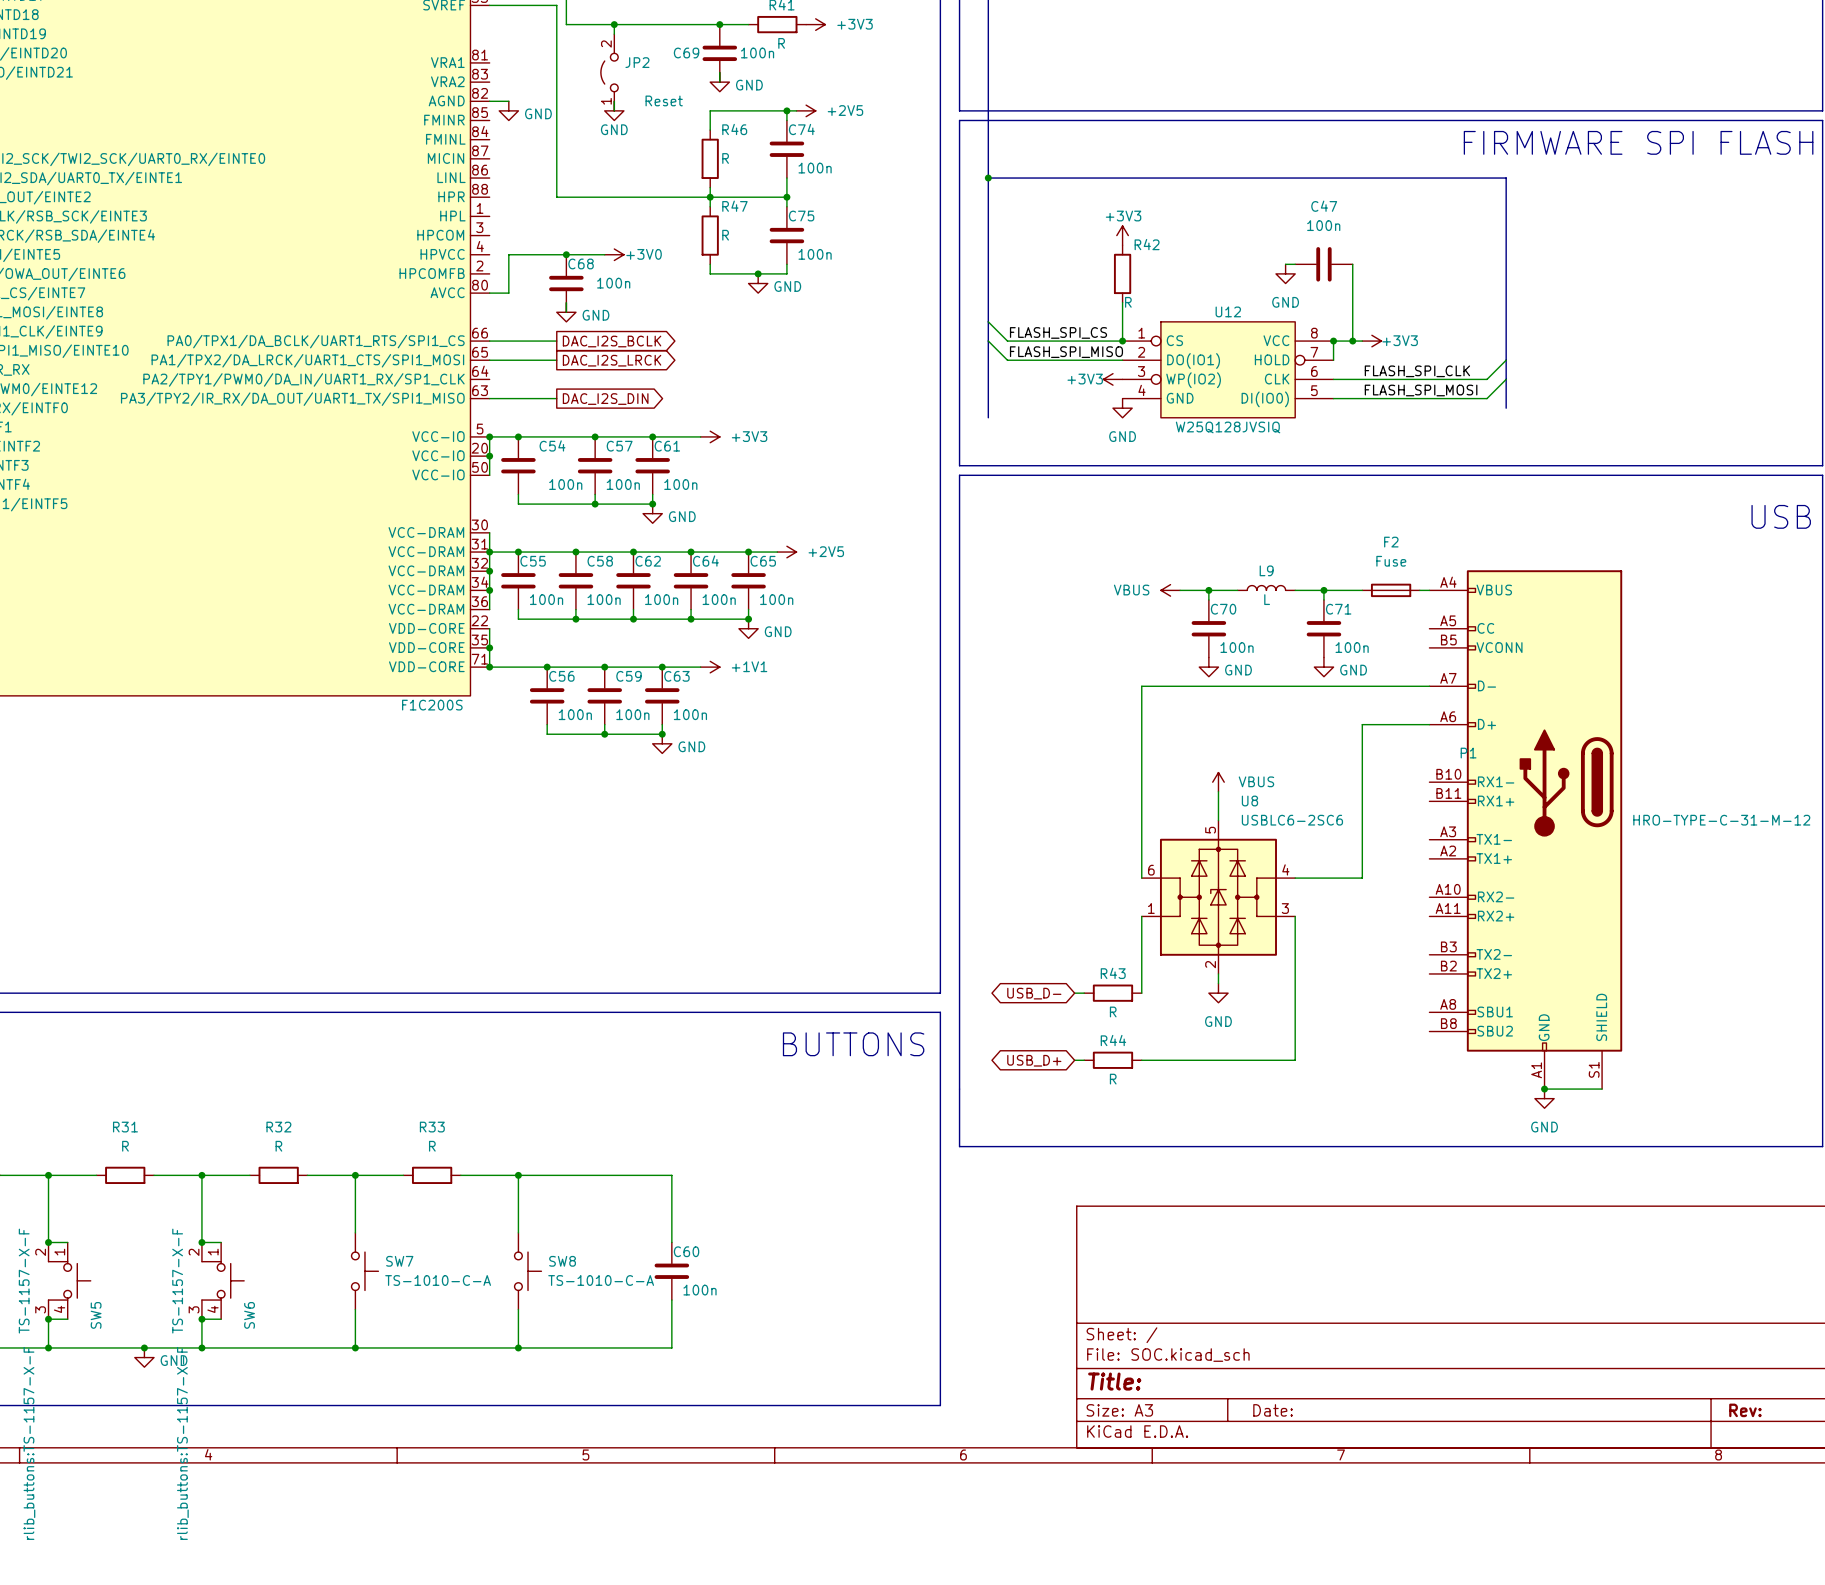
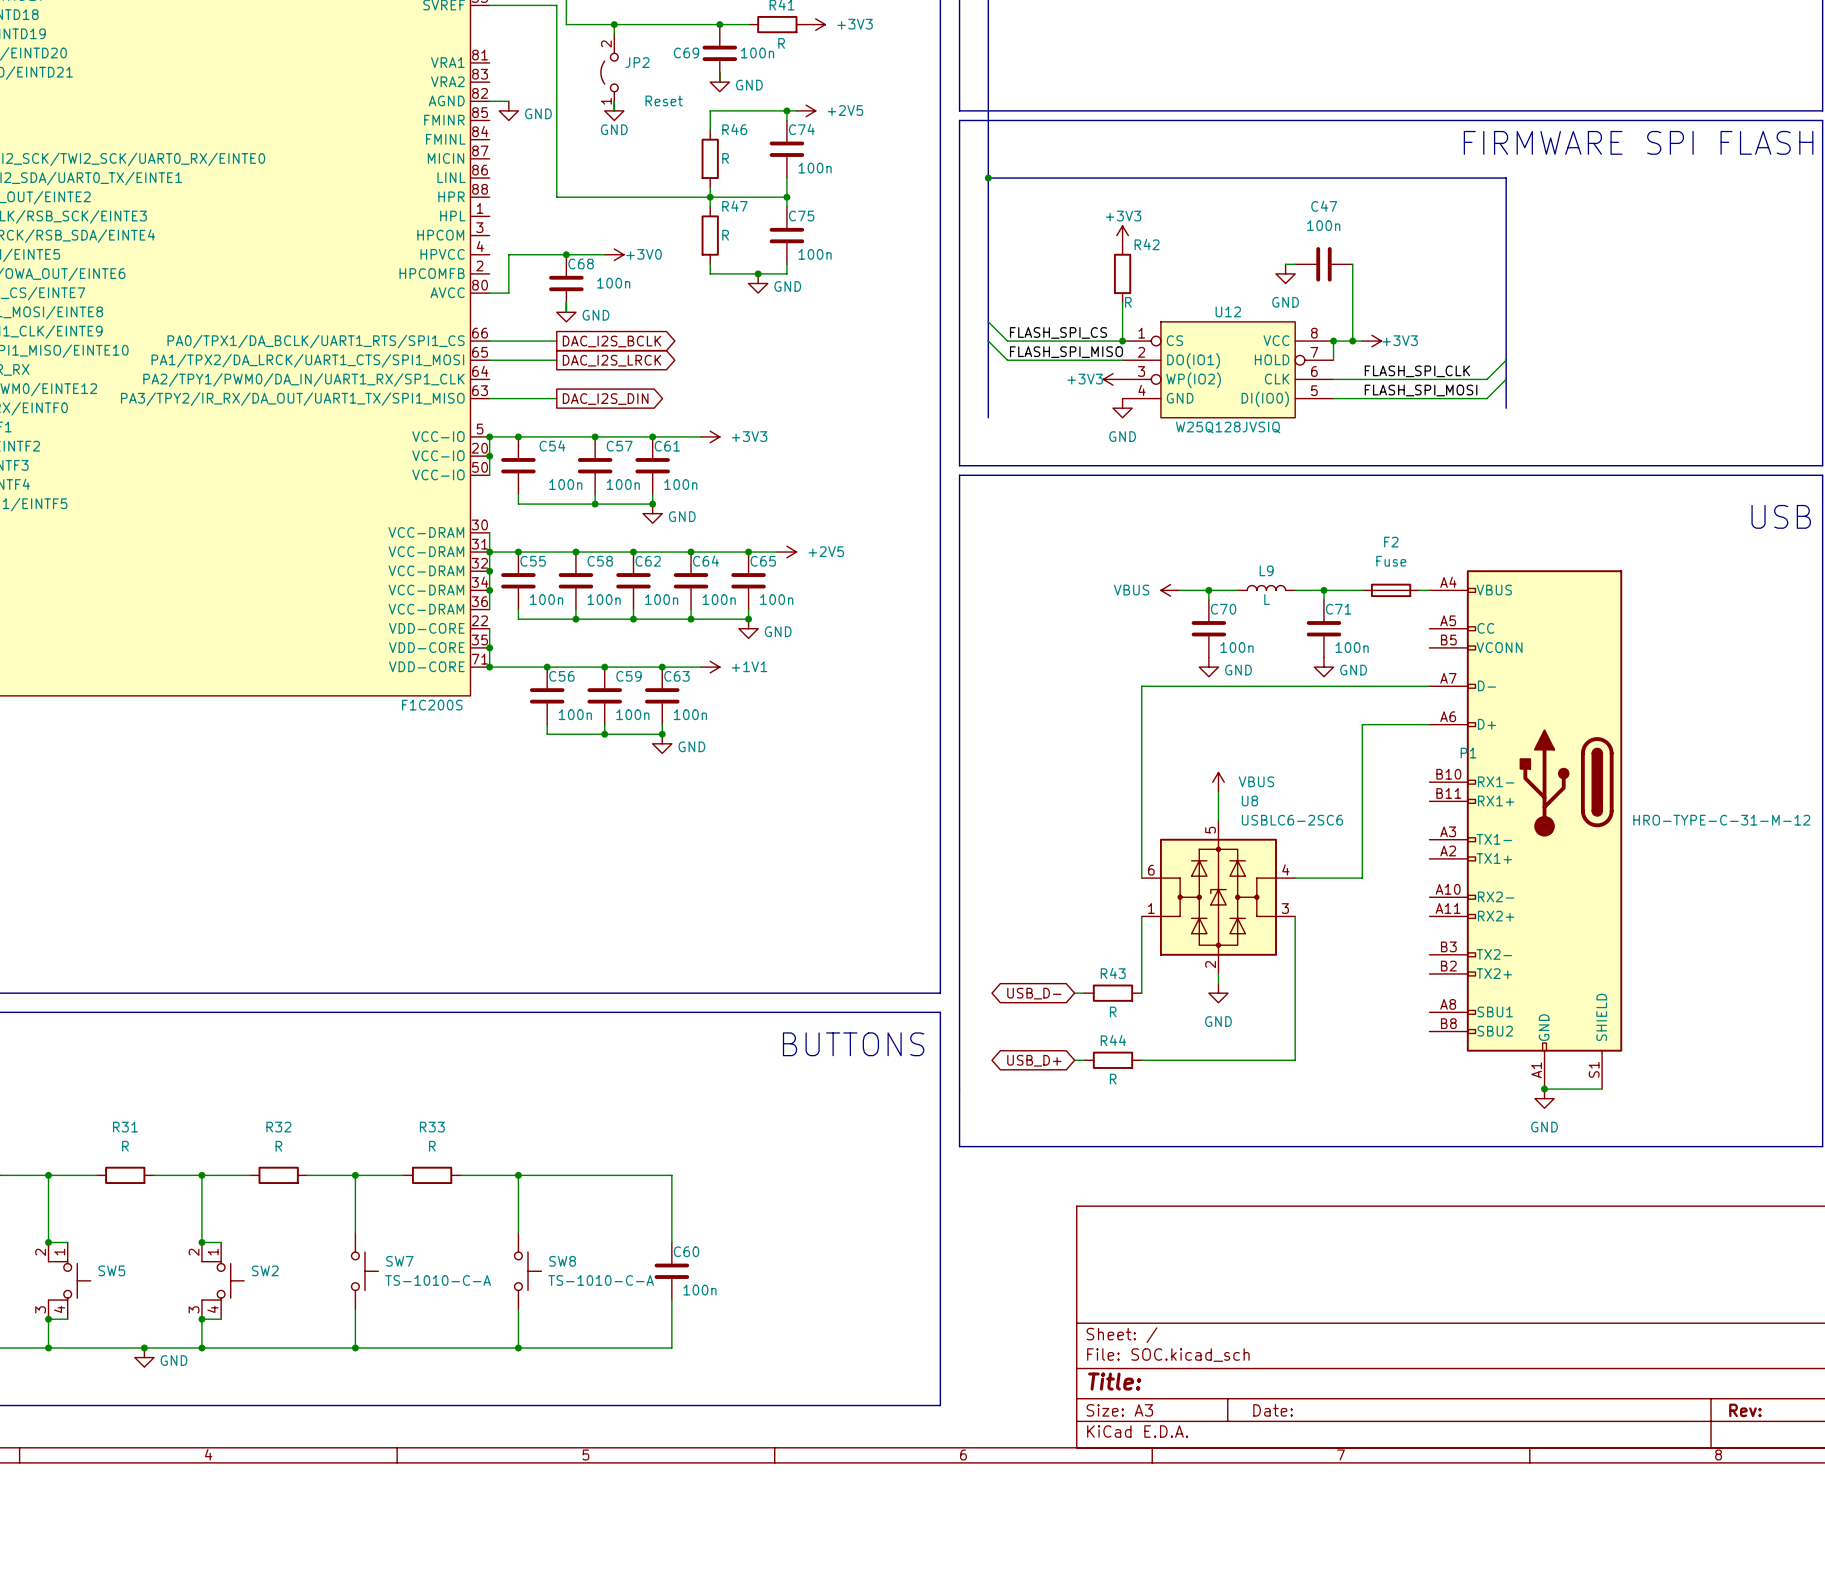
SW5 value: TS-1157-X-F (24, 1281) -> none
SW6 value: TS-1157-X-F (177, 1281) -> none
SW5 name rotation: 0° (96, 1315) -> 90° clockwise (111, 1270)
SW5 name position: SW5 (96, 1315) -> SW5 (111, 1270)
SW6 name: SW6 (249, 1315) -> SW2 (265, 1270)
SW5 text: rlib_buttons:TS-1157-X-F (29, 1443) -> none
SW6 text: rlib_buttons:TS-1157-X-F (182, 1443) -> none

